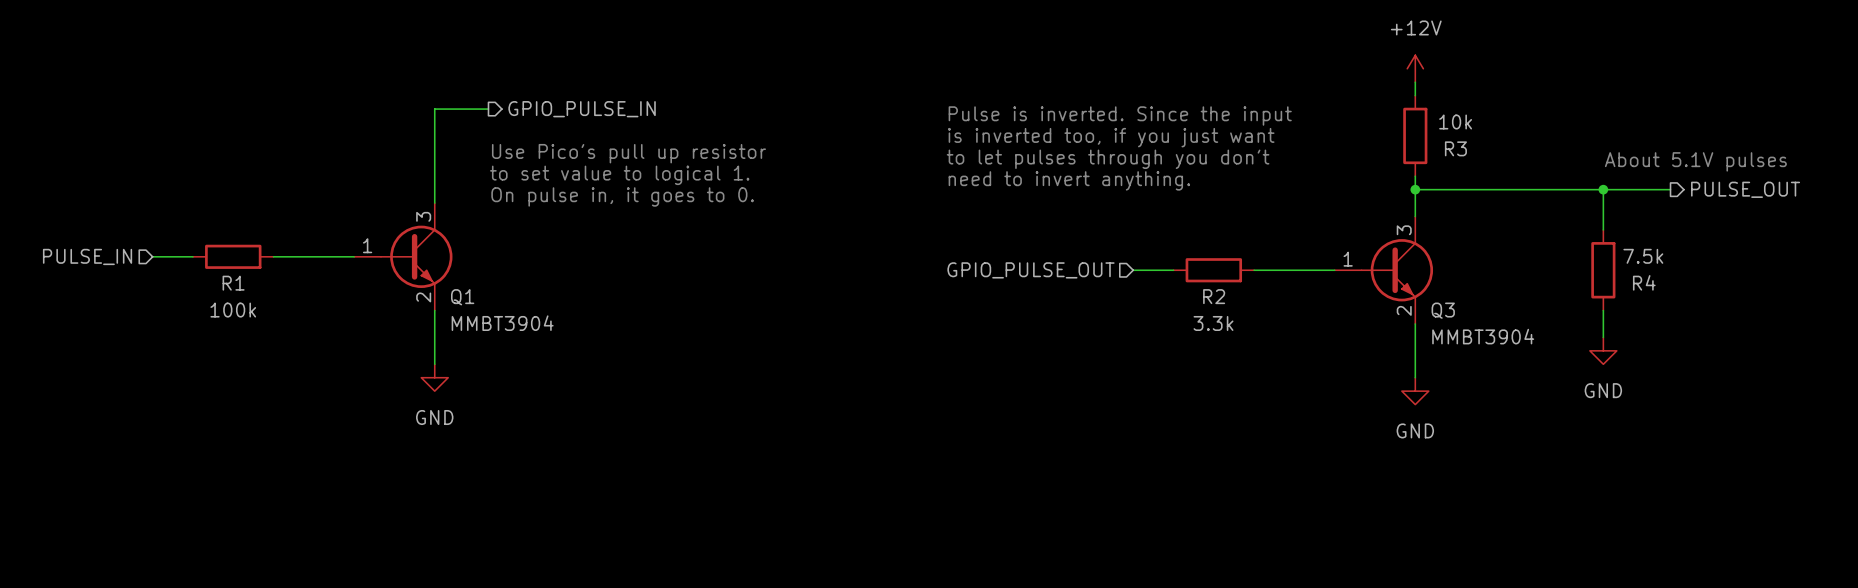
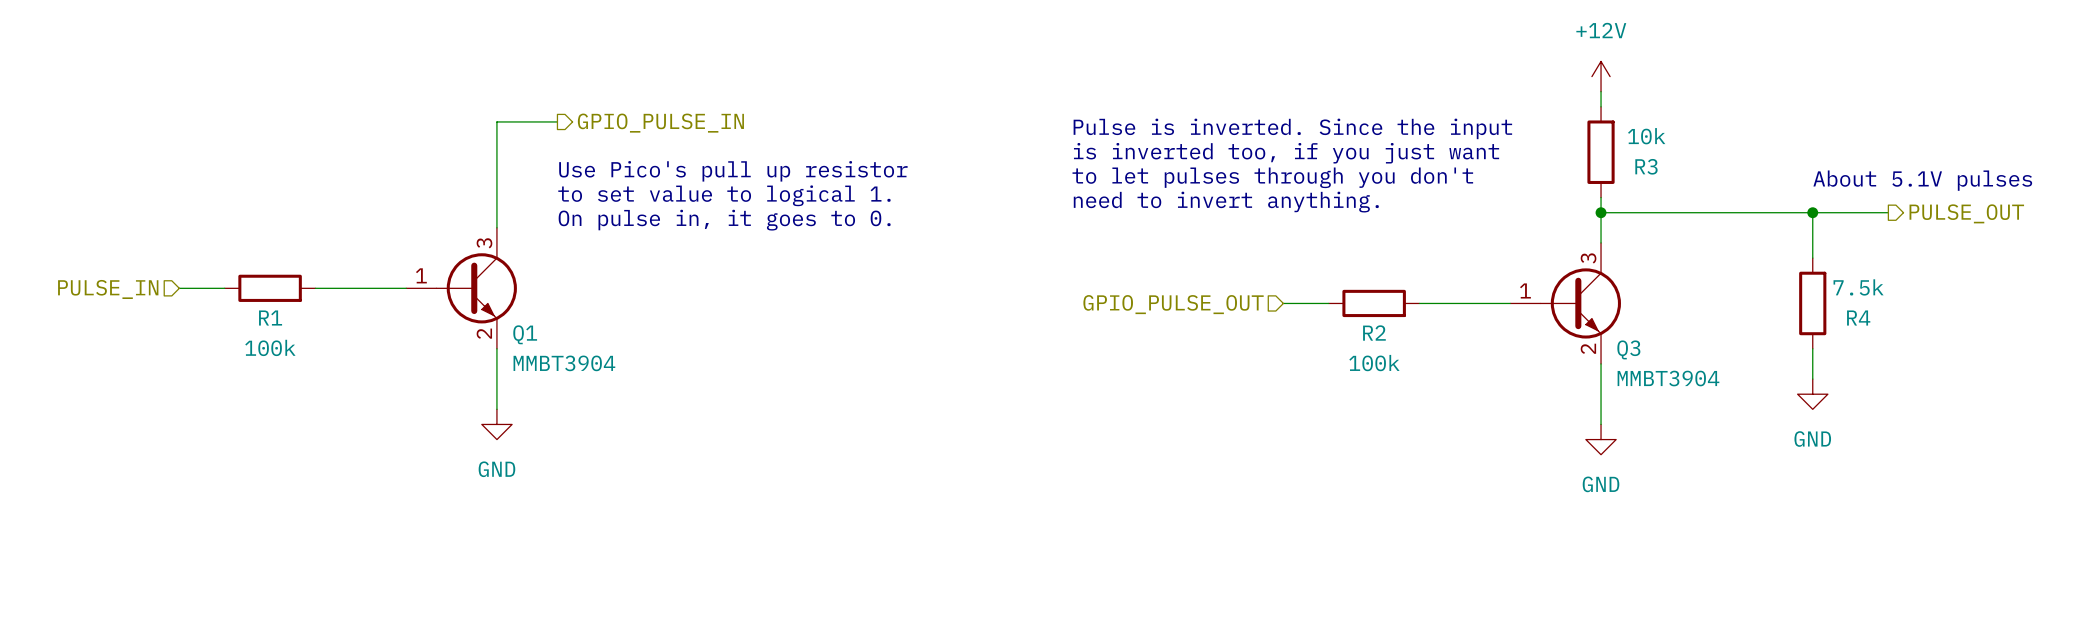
R2 value: 3.3k (1213, 323) -> 100k (1374, 363)

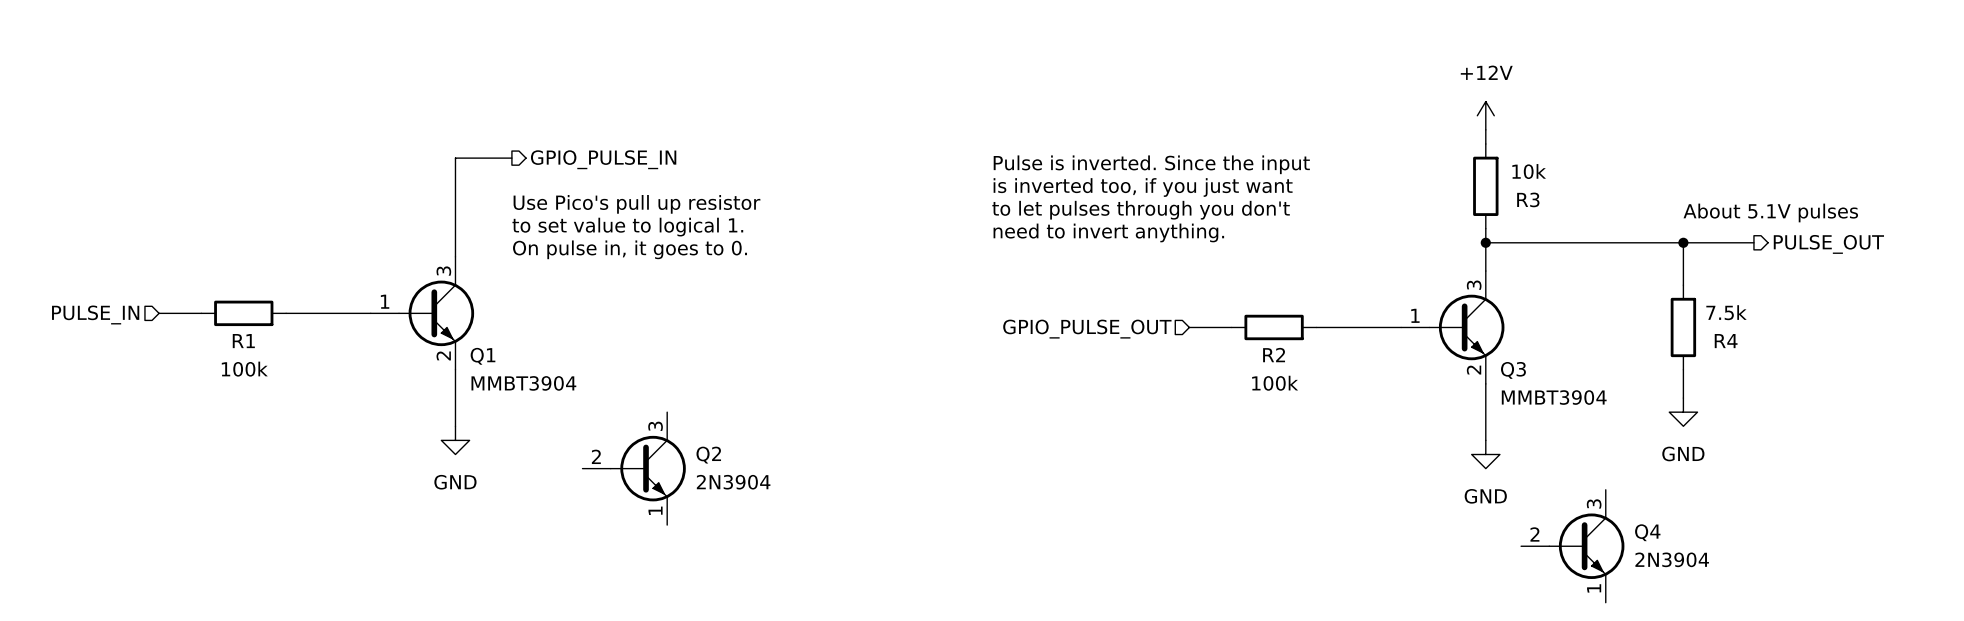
Q2: none -> 2N3904 (634, 468)
Q4: none -> 2N3904 (1572, 546)

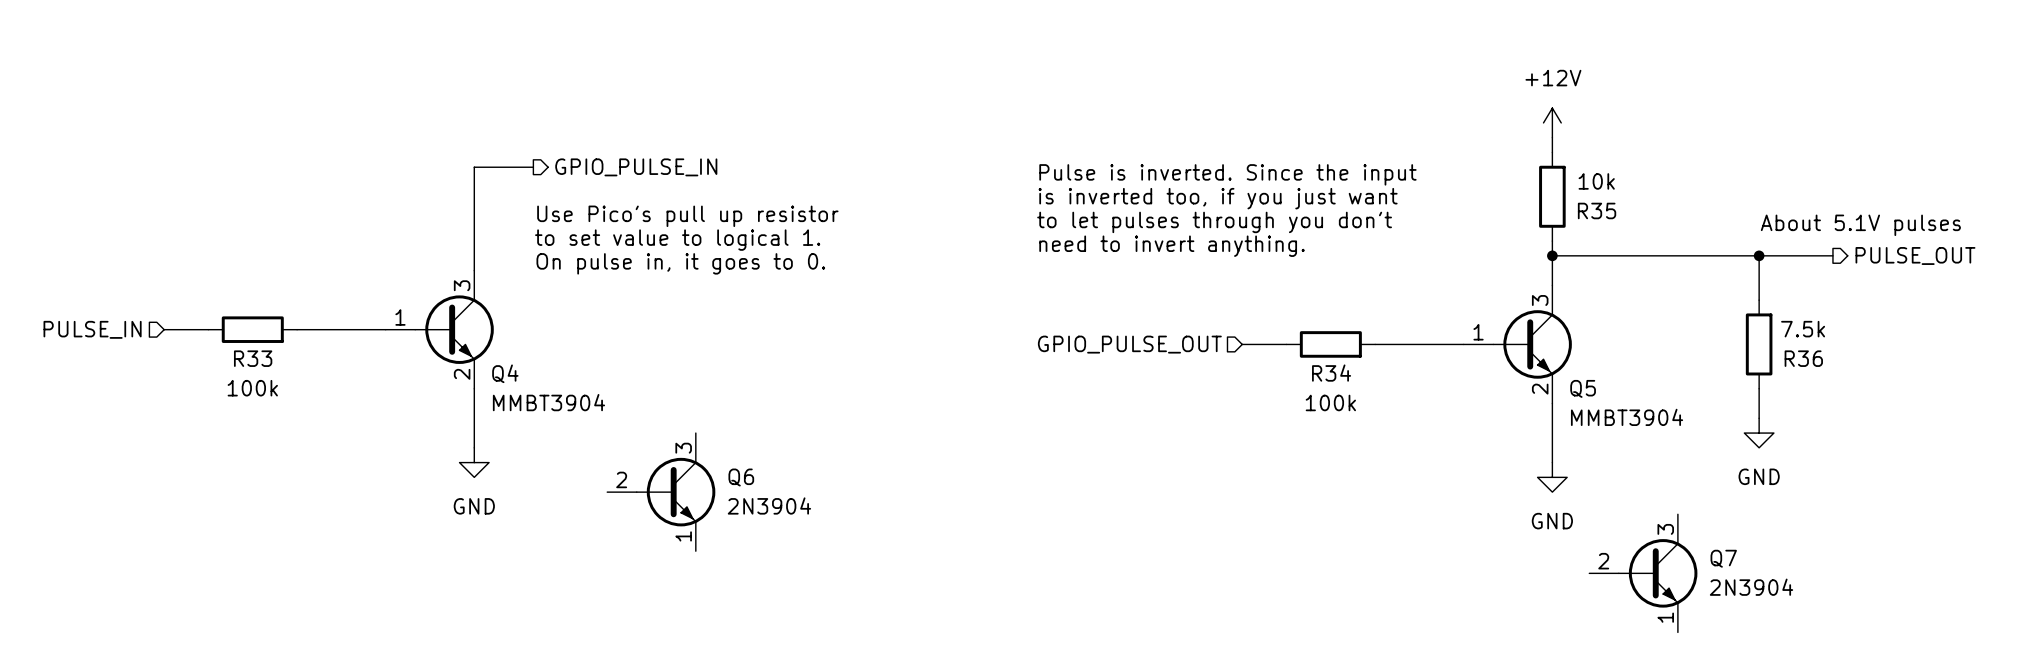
R3 name: R3 (1528, 199) -> R35 (1597, 210)
R1 name: R1 (243, 341) -> R33 (253, 358)
R4 name: R4 (1726, 341) -> R36 (1803, 358)
R2 name: R2 (1274, 355) -> R34 (1331, 373)
Q1 name: Q1 (483, 356) -> Q4 (505, 373)
Q3 name: Q3 (1513, 370) -> Q5 (1583, 388)
Q2 name: Q2 (708, 455) -> Q6 (741, 477)
Q4 name: Q4 (1647, 532) -> Q7 (1723, 558)

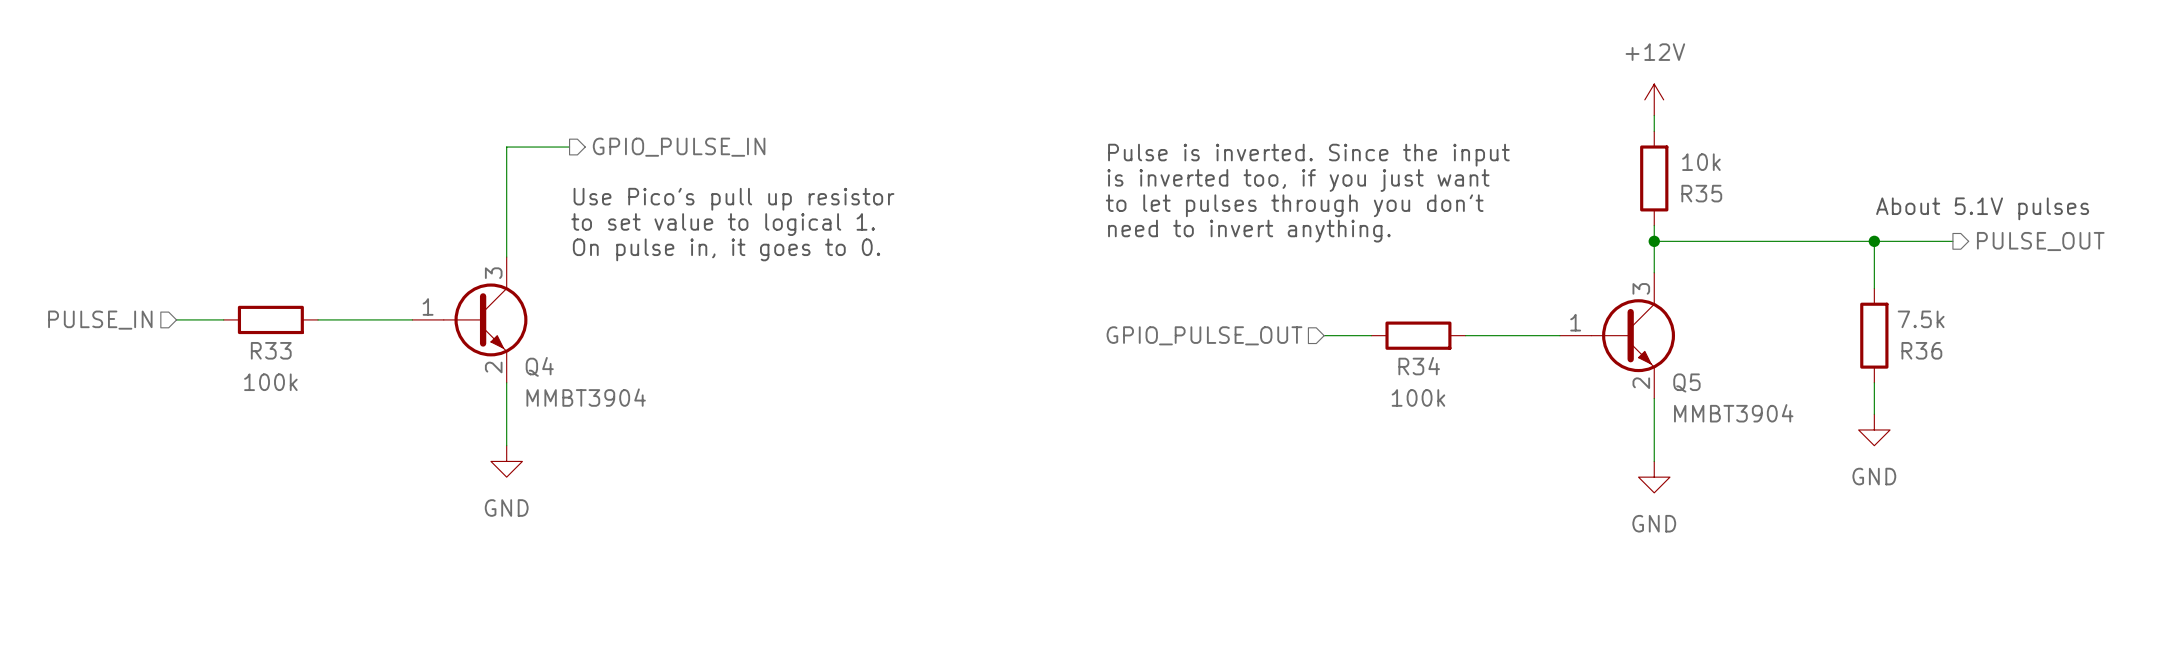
Q6: 2N3904 (661, 492) -> none
Q7: 2N3904 (1643, 573) -> none

